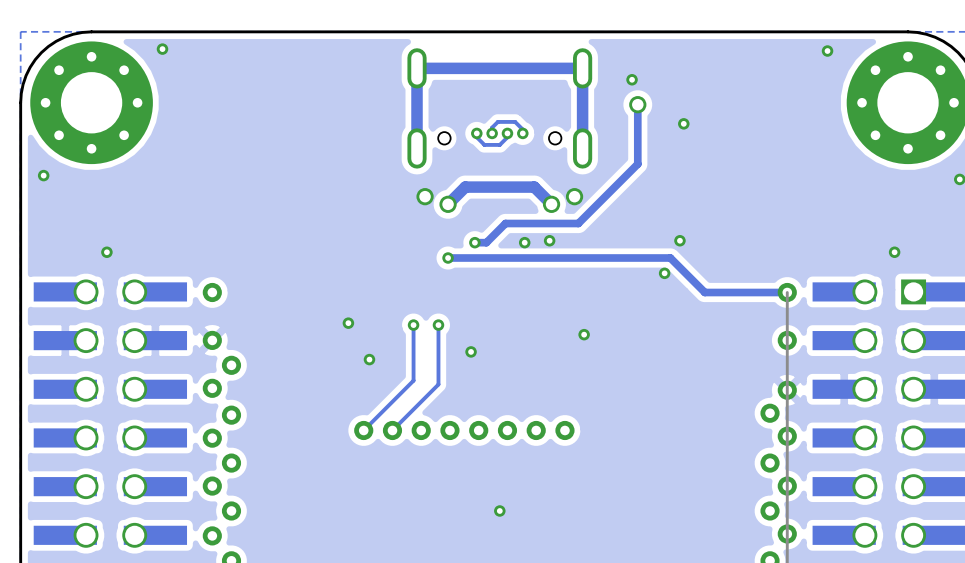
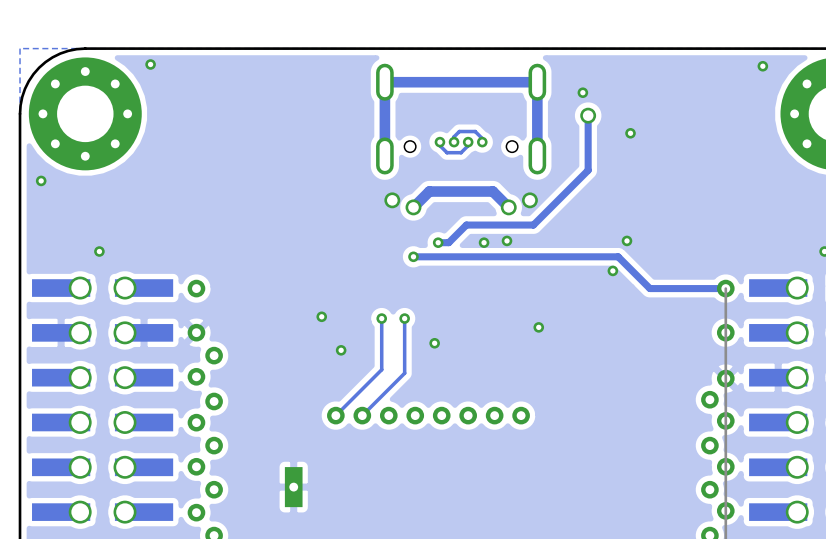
part: none -> (293, 487)
via: (499, 510) -> none

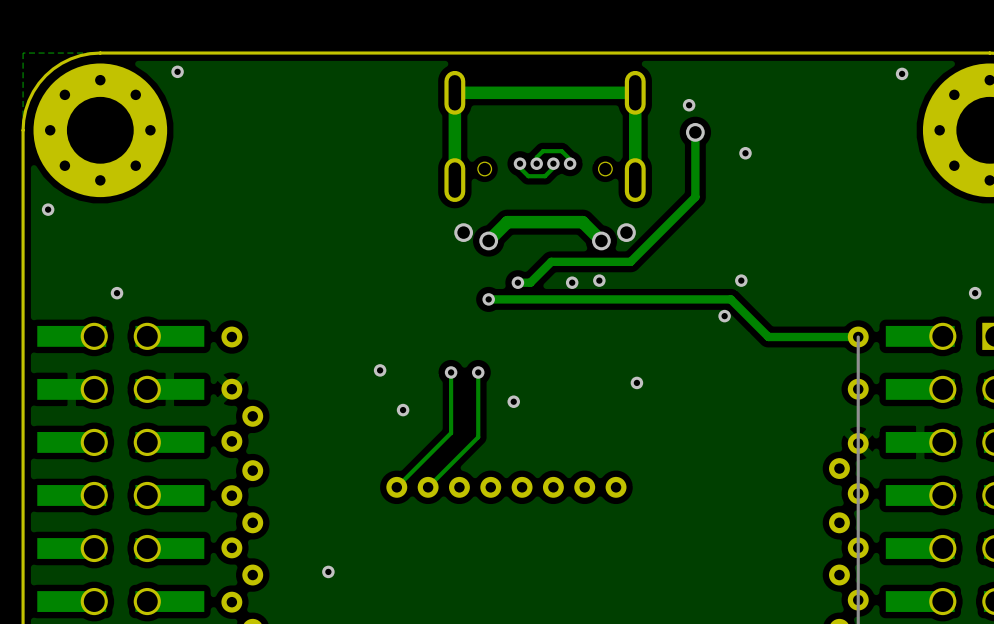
via: none -> (328, 571)
part: (293, 487) -> none

